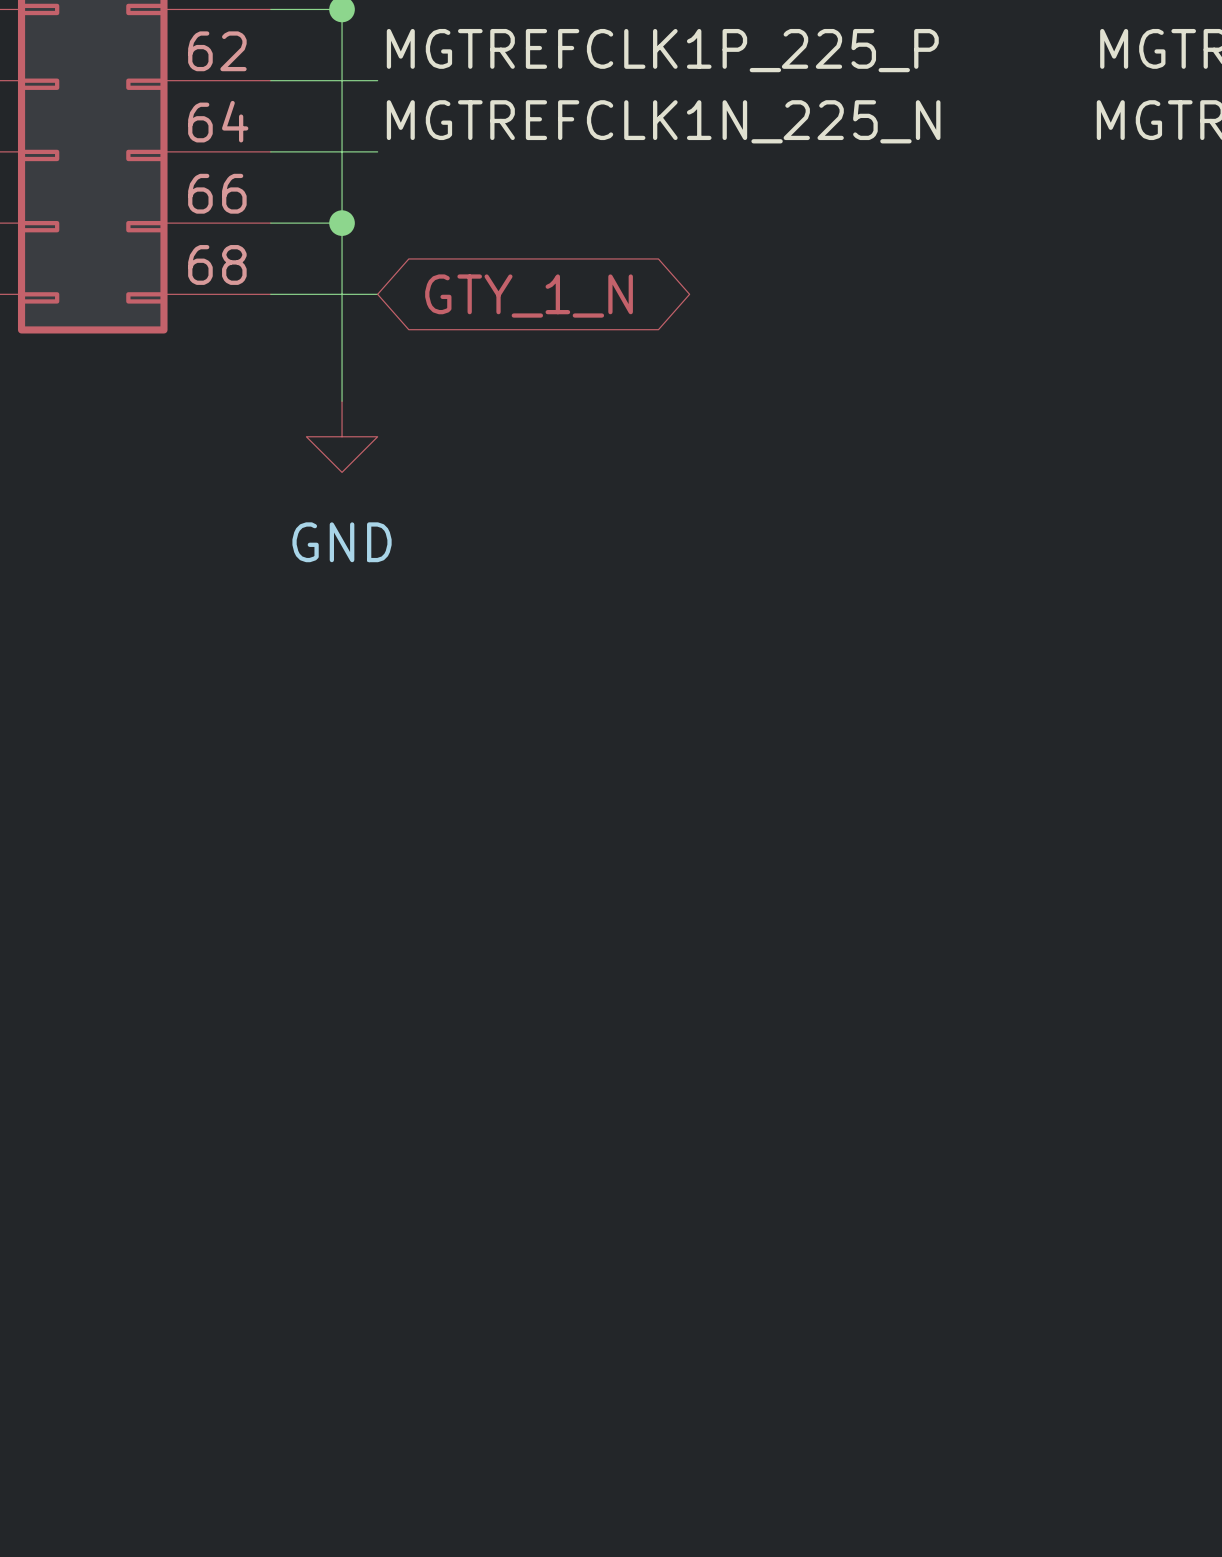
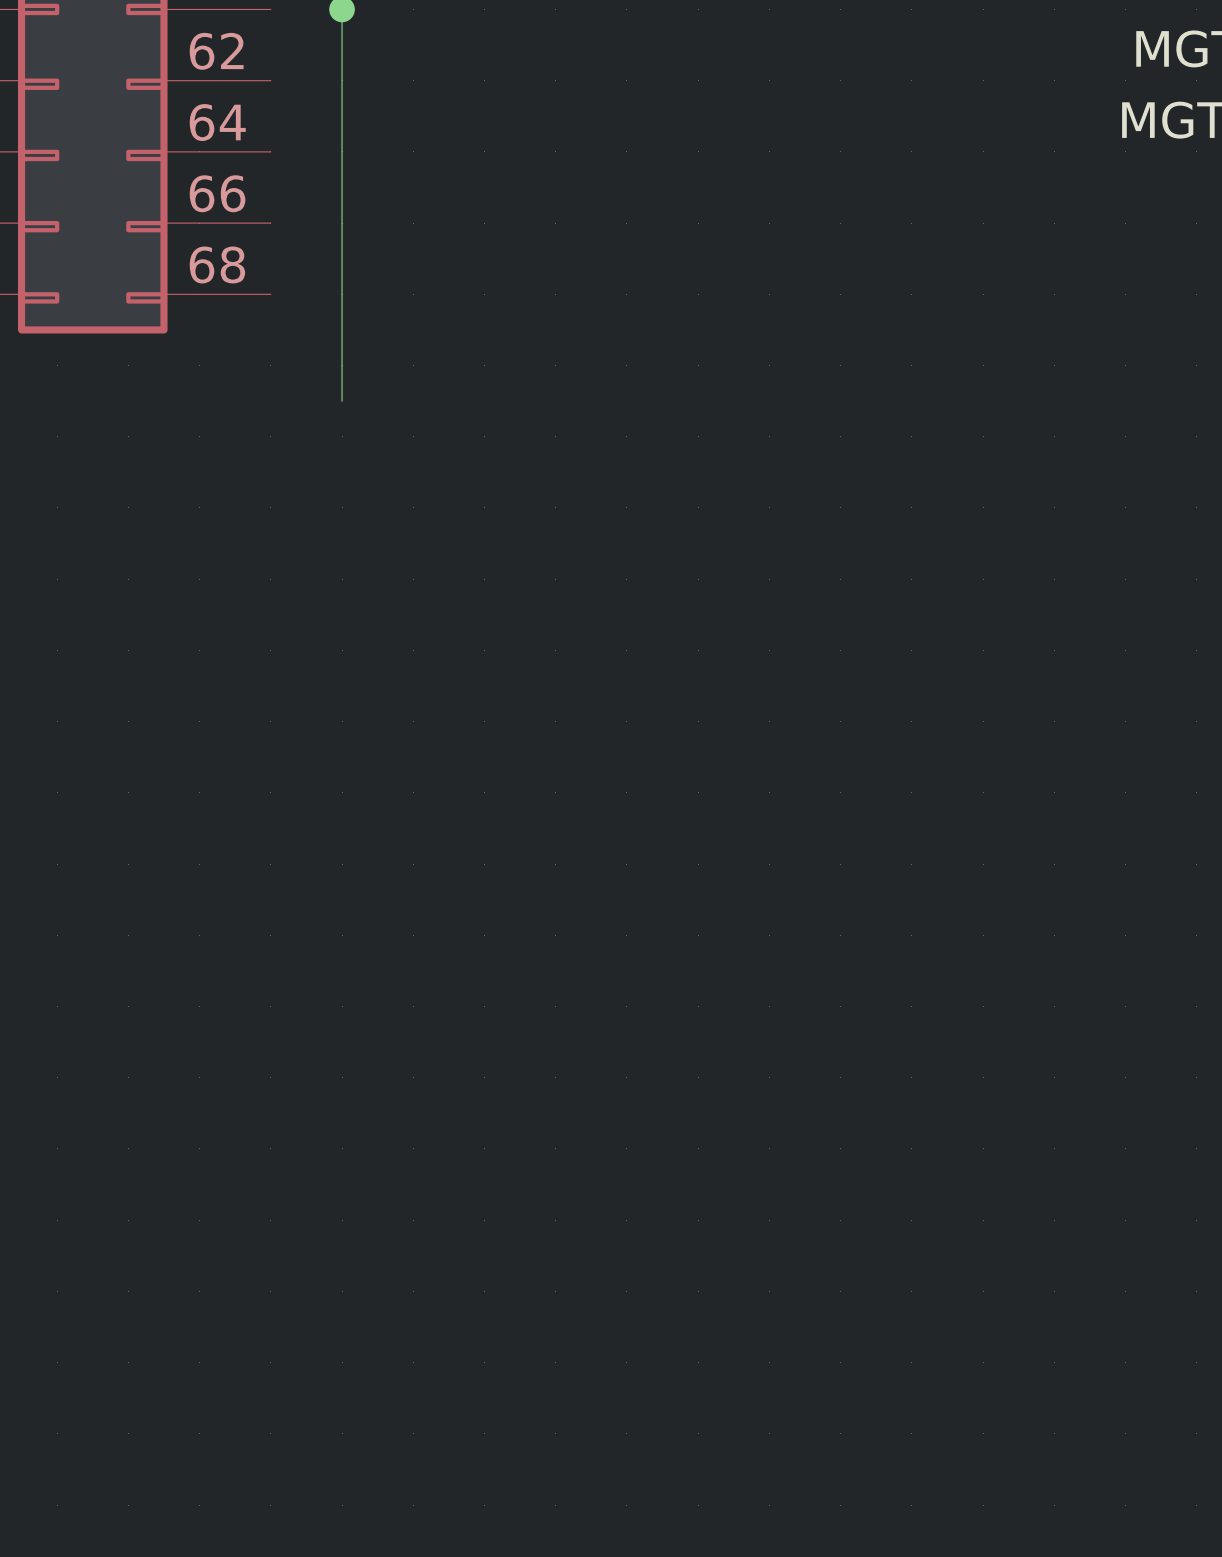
wire: (270, 9) (342, 9) -> none
label: MGTREFCLK1P_225_P (662, 50) -> none
wire: (270, 80) (377, 80) -> none
label: MGTREFCLK1N_225_N (663, 121) -> none
wire: (270, 151) (377, 151) -> none
wire: (270, 223) (342, 223) -> none
junction: (342, 223) -> none
wire: (270, 294) (377, 294) -> none
global label: GTY_1_N (529, 296) -> none
power symbol: GND (342, 436) -> none

